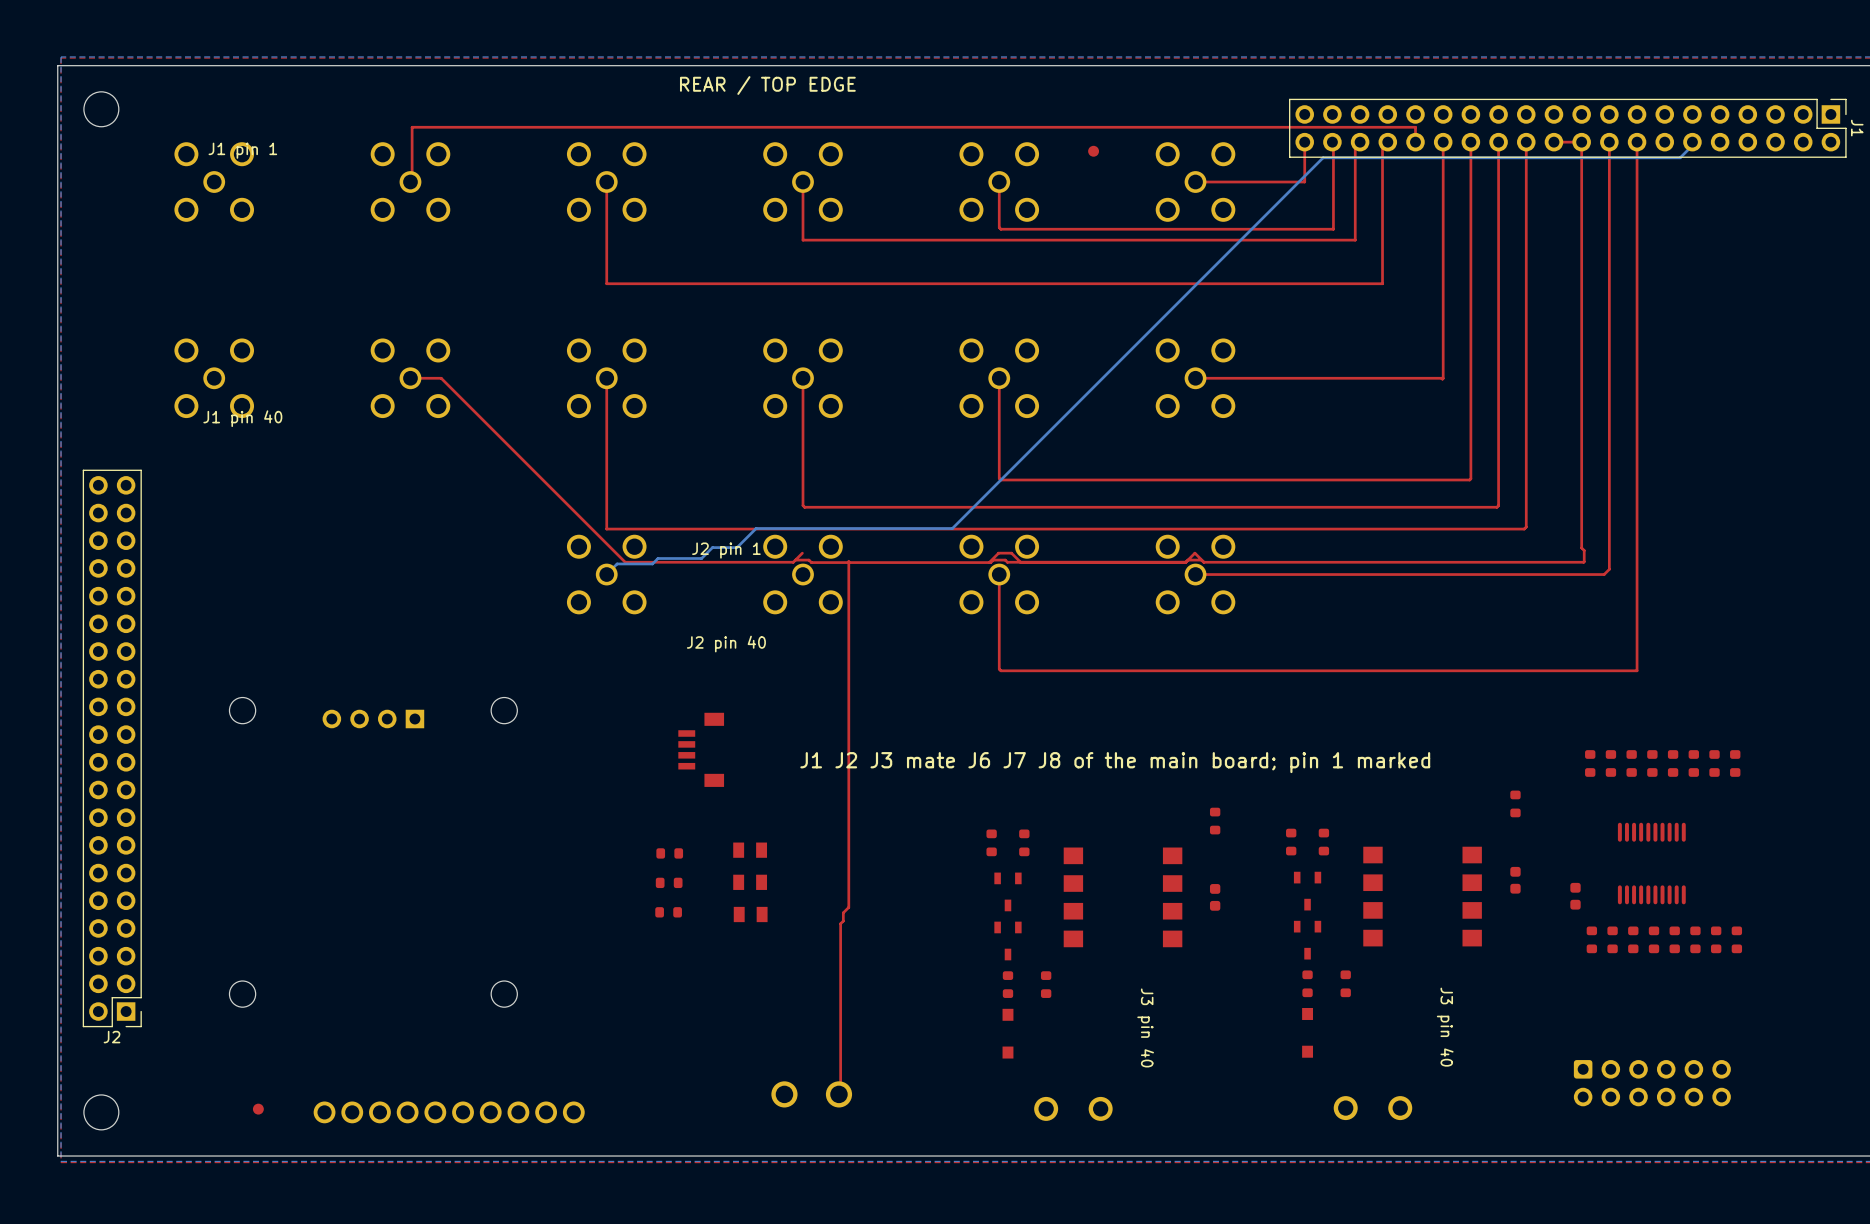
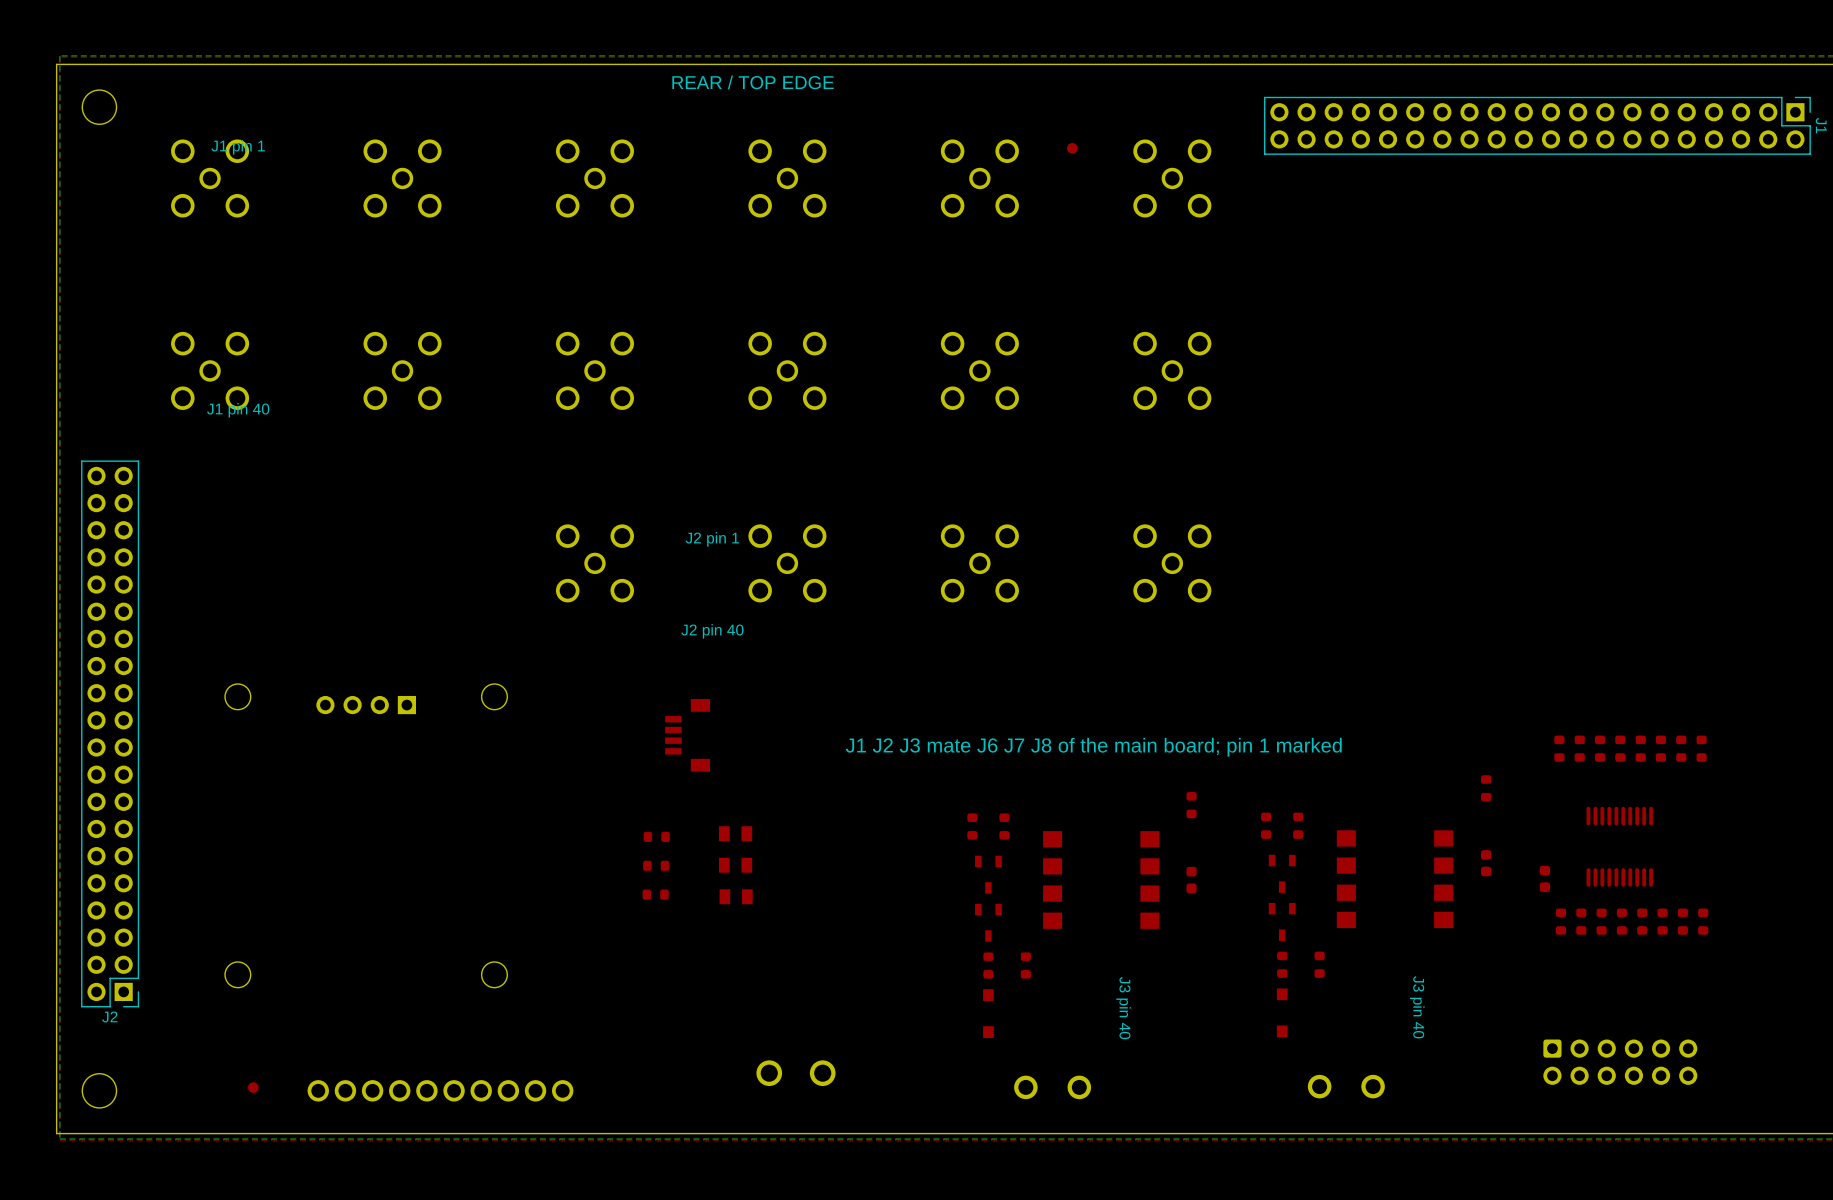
top track: (1304, 142) (1304, 182) (1195, 182) -> none
top track: (1332, 142) (1333, 229) (1000, 229) (999, 227) (999, 182) -> none
top track: (1360, 142) (1355, 147) (1355, 240) (803, 240) (803, 182) -> none
top track: (1387, 142) (1382, 147) (1382, 283) (606, 283) (606, 182) (602, 185) -> none
top track: (1415, 142) (1415, 127) (412, 127) (412, 180) (410, 182) -> none
top track: (1443, 142) (1442, 379) (1195, 378) -> none
top track: (1470, 142) (1469, 480) (1000, 480) (999, 478) (999, 378) -> none
top track: (1498, 142) (1498, 505) (1497, 507) (804, 507) (803, 505) (803, 378) -> none
top track: (1526, 142) (1526, 527) (1524, 529) (606, 529) (606, 378) -> none
top track: (1553, 142) (1581, 142) (1581, 547) (1584, 550) (1583, 562) (1204, 562) (1194, 553) (1185, 562) (1007, 562) (1005, 560) (993, 560) (990, 562) (811, 562) (808, 560) (795, 560) -> none
top track: (1609, 142) (1609, 569) (1604, 574) (1195, 574) -> none
top track: (1637, 142) (1637, 670) (1000, 670) (999, 669) (999, 574) -> none
bottom track: (1692, 142) (1692, 145) (1680, 157) (1323, 157) (952, 528) (756, 528) (737, 547) (712, 547) (701, 558) (657, 558) (652, 563) (617, 563) (606, 574) -> none
top track: (410, 378) (441, 378) (625, 562) (793, 562) (802, 553) -> none
top track: (1187, 560) (1201, 560) (1203, 562) -> none
top track: (848, 561) (848, 907) (843, 912) (843, 921) (840, 923) (840, 1081) -> none
top track: (1020, 562) (1011, 553) (998, 553) (989, 562) -> none

